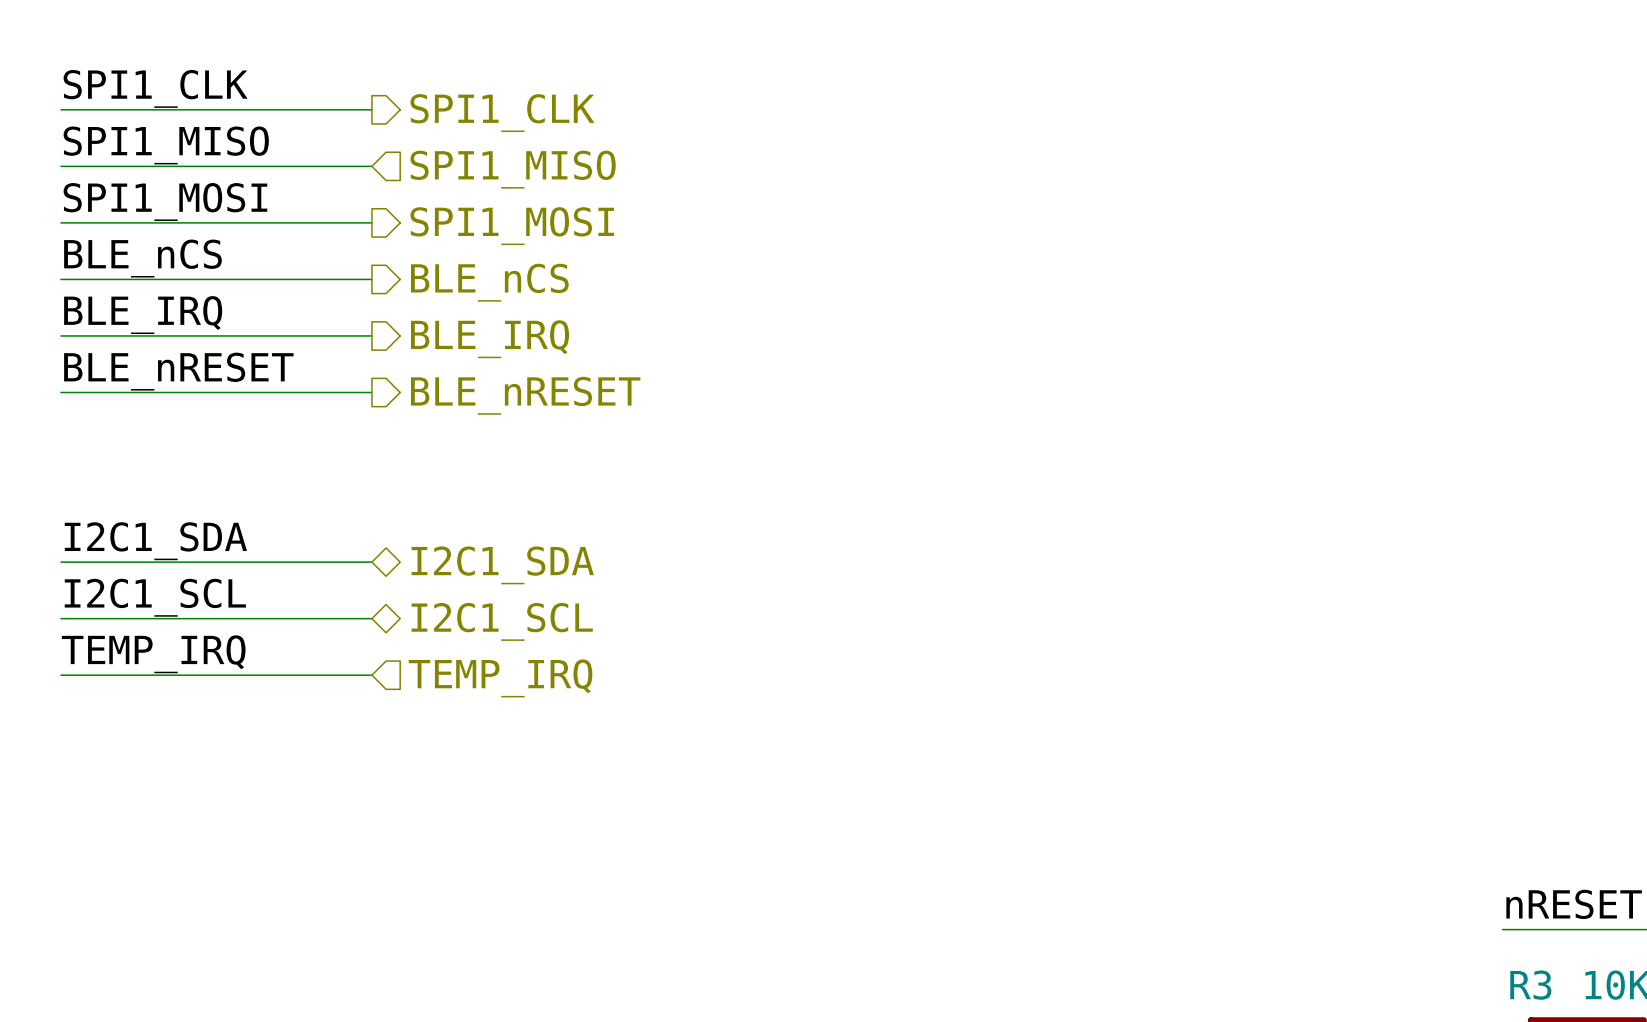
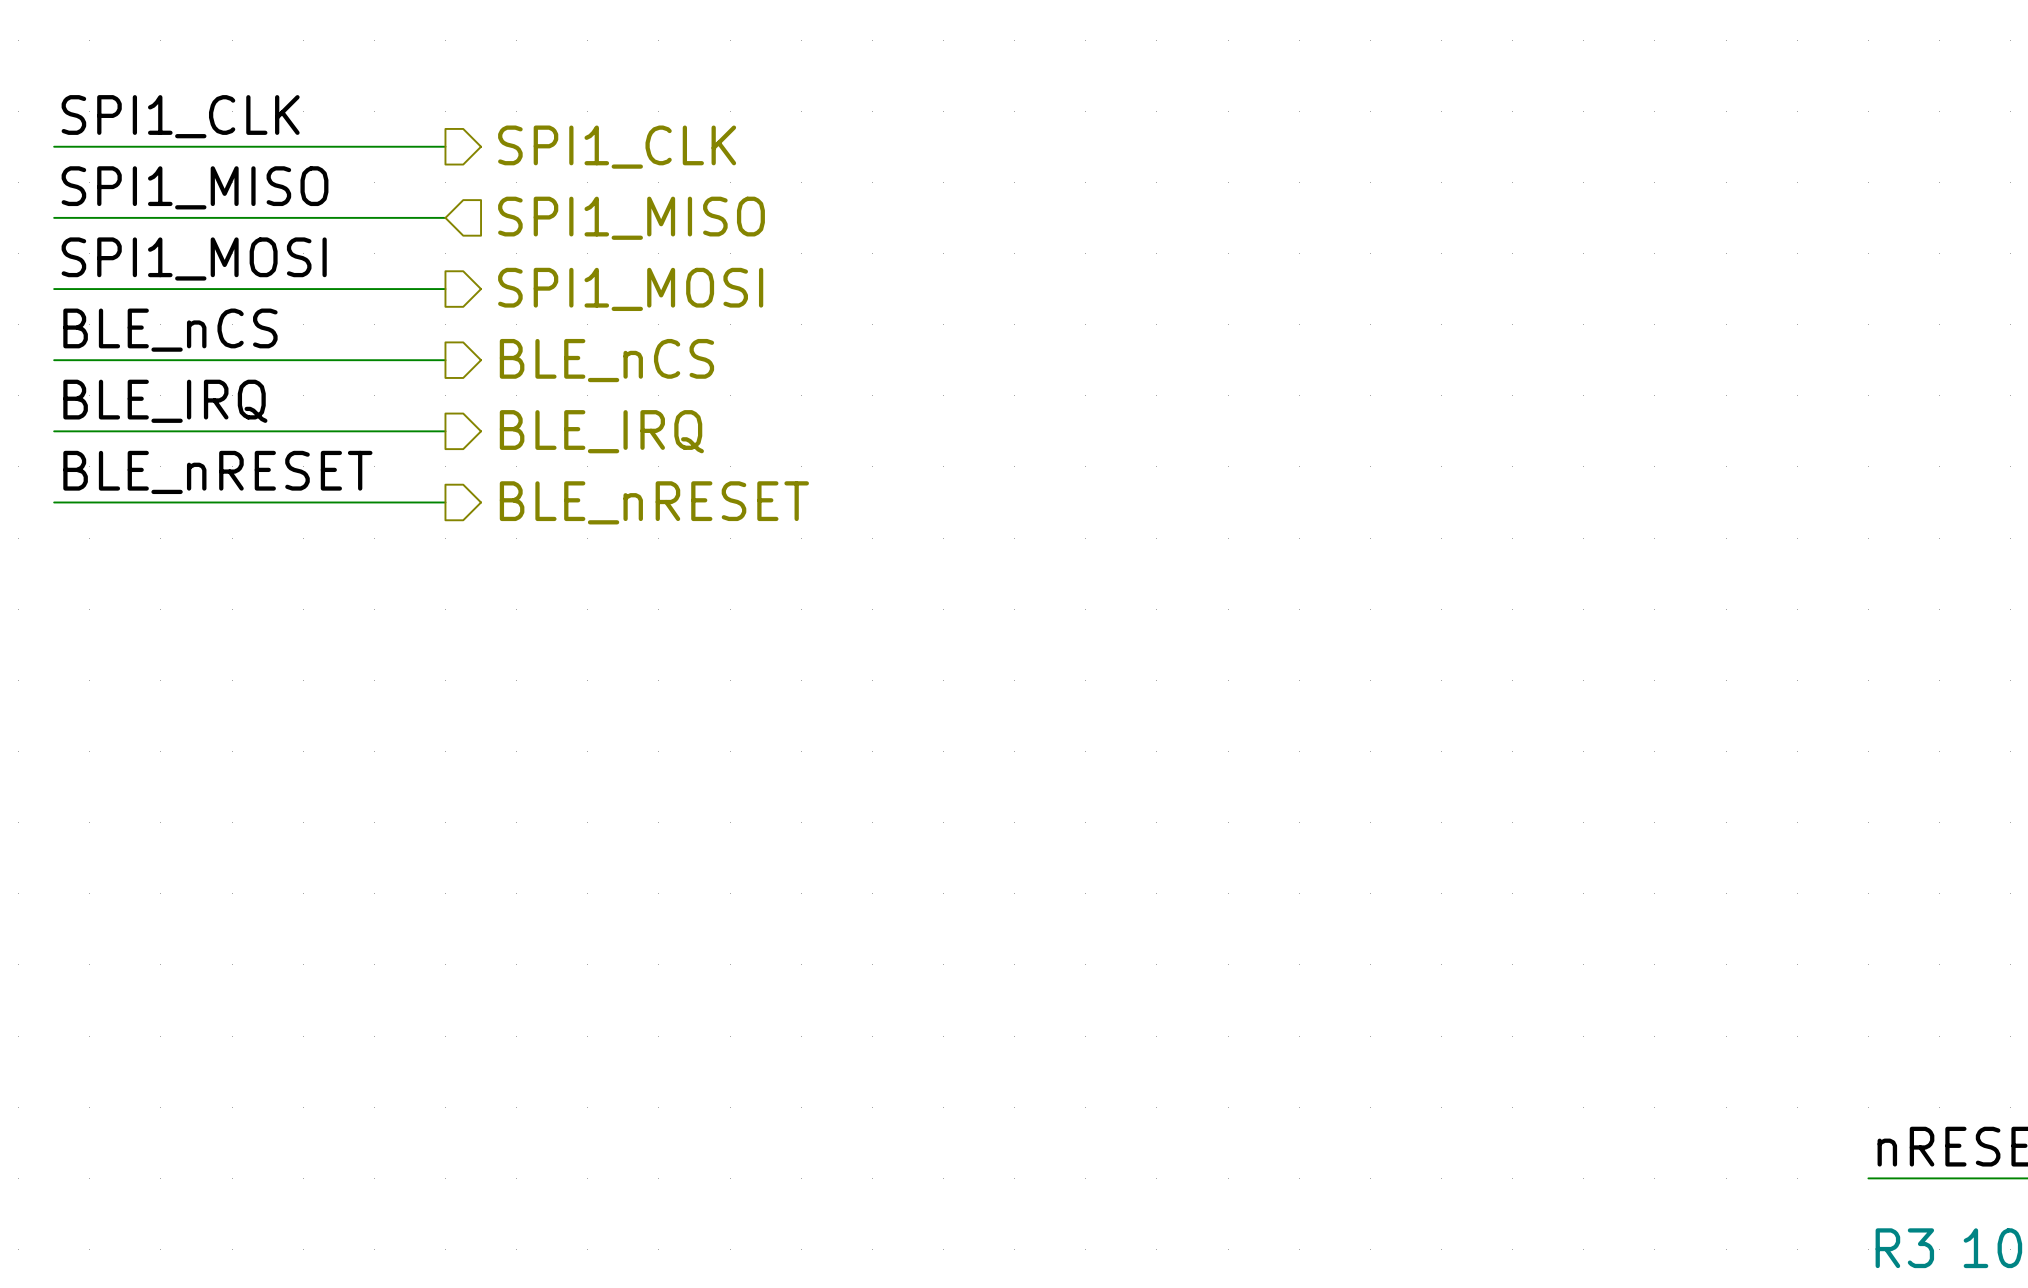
label: I2C1_SDA (155, 541) -> none
wire: (60, 562) (371, 562) -> none
hierarchical label: I2C1_SDA (502, 565) -> none
label: I2C1_SCL (155, 597) -> none
wire: (60, 618) (371, 618) -> none
hierarchical label: I2C1_SCL (502, 621) -> none
label: TEMP_IRQ (153, 654) -> none
wire: (60, 675) (371, 675) -> none
hierarchical label: TEMP_IRQ (500, 678) -> none

